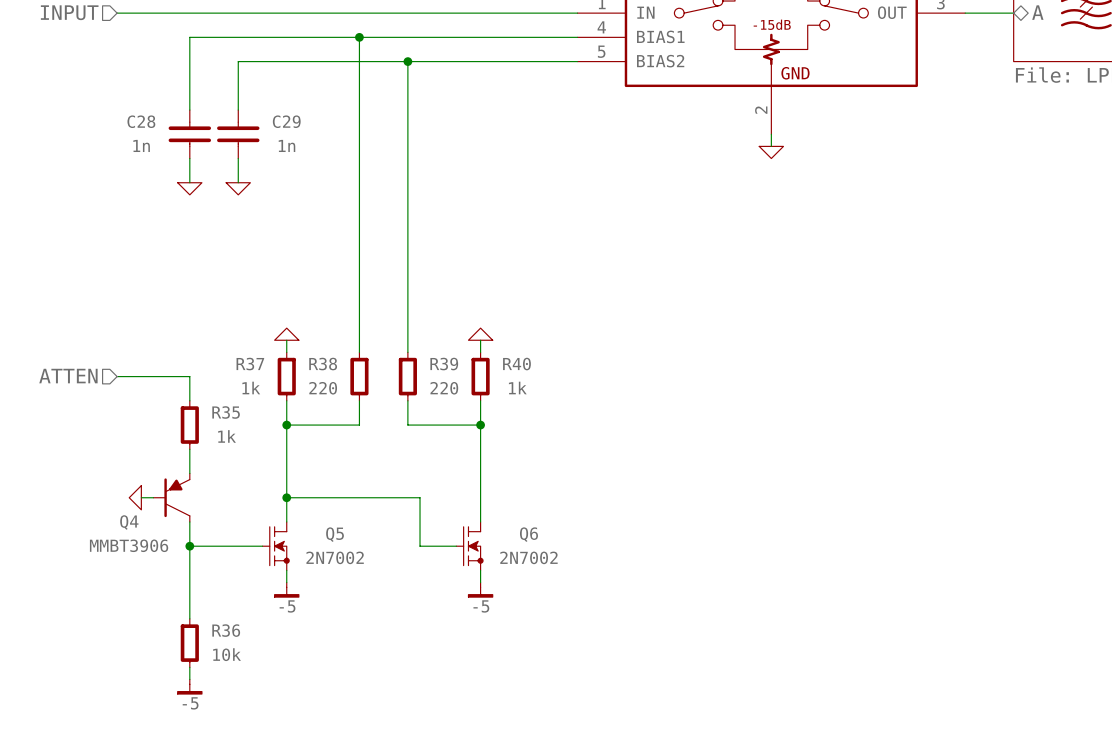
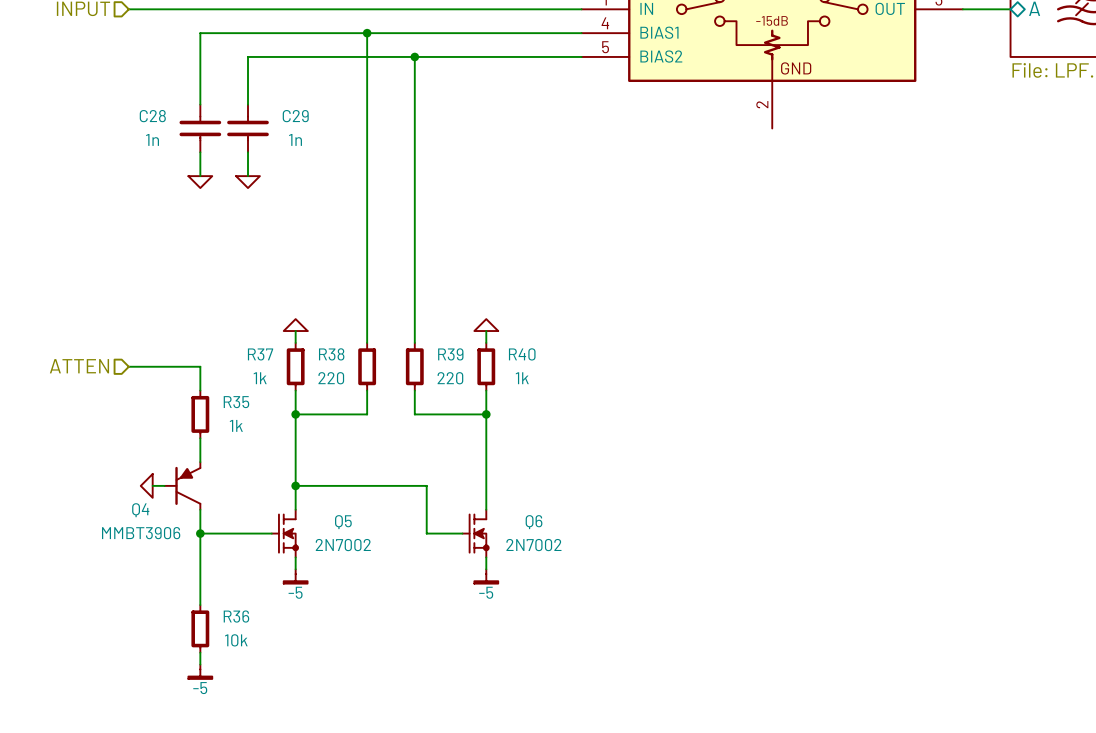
wire: (771, 134) (771, 146) -> none
power symbol: (771, 152) -> none

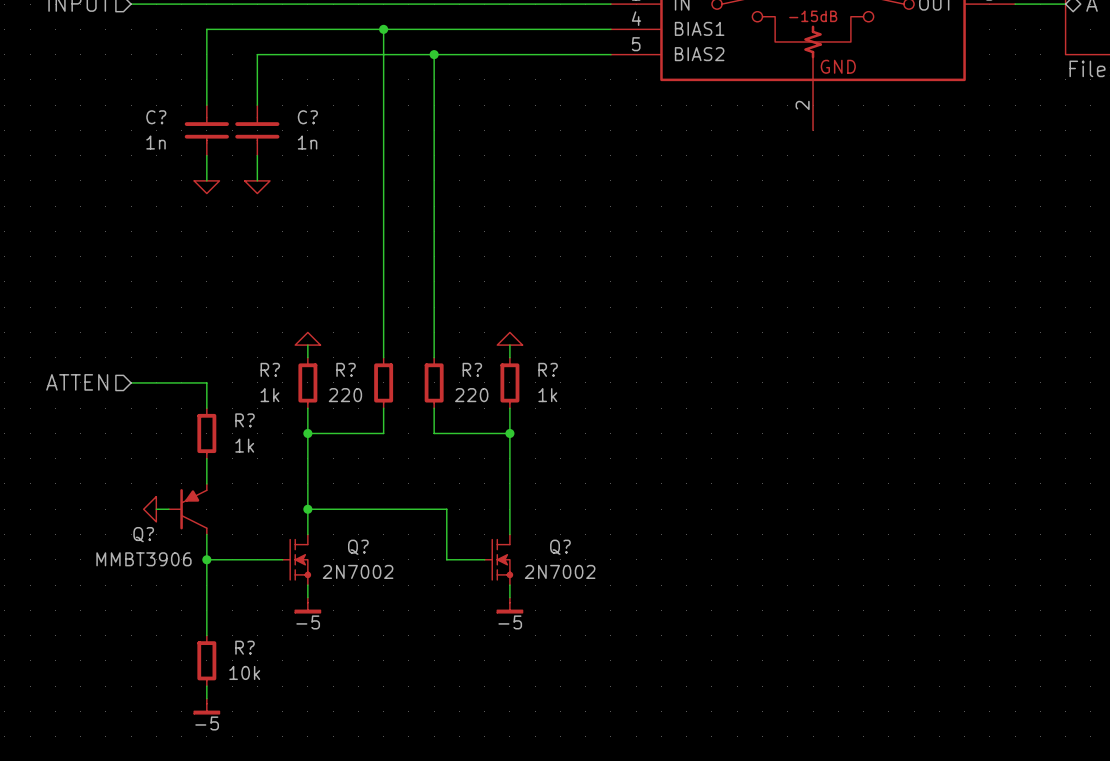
C28 name: C28 (152, 116) -> C? (156, 117)
C29 name: C29 (295, 116) -> C? (307, 117)
R37 name: R37 (260, 354) -> R? (270, 369)
R38 name: R38 (331, 354) -> R? (346, 369)
R39 name: R39 (450, 354) -> R? (472, 369)
R40 name: R40 (522, 354) -> R? (548, 369)
R35 name: R35 (236, 402) -> R? (245, 420)
Q4 name: Q4 (140, 510) -> Q? (143, 534)
Q5 name: Q5 (343, 522) -> Q? (358, 547)
Q6 name: Q6 (534, 522) -> Q? (560, 547)
R36 name: R36 (236, 616) -> R? (245, 647)

